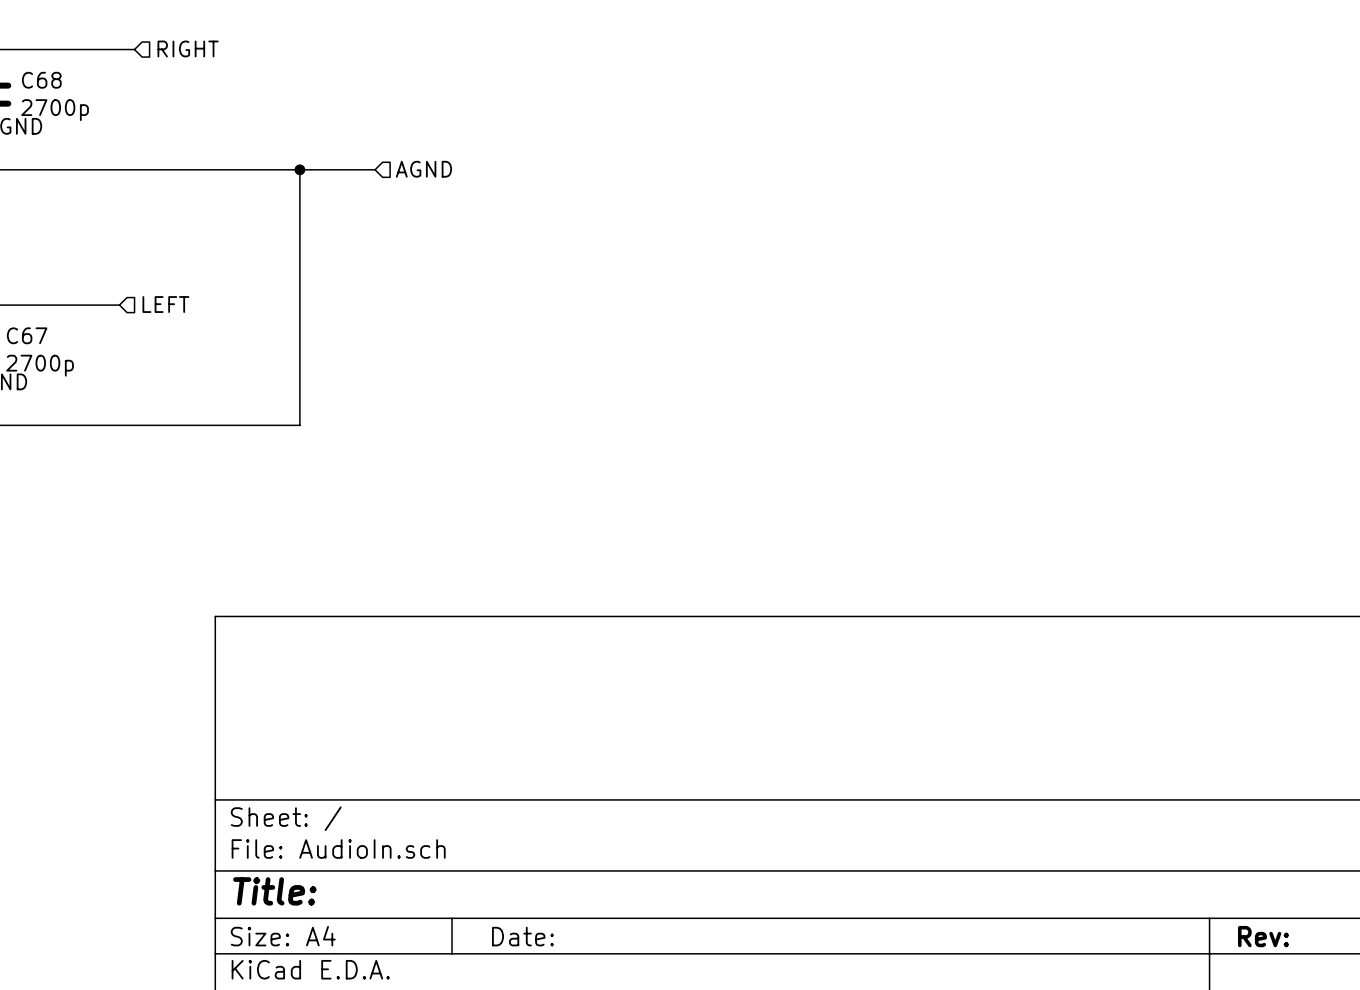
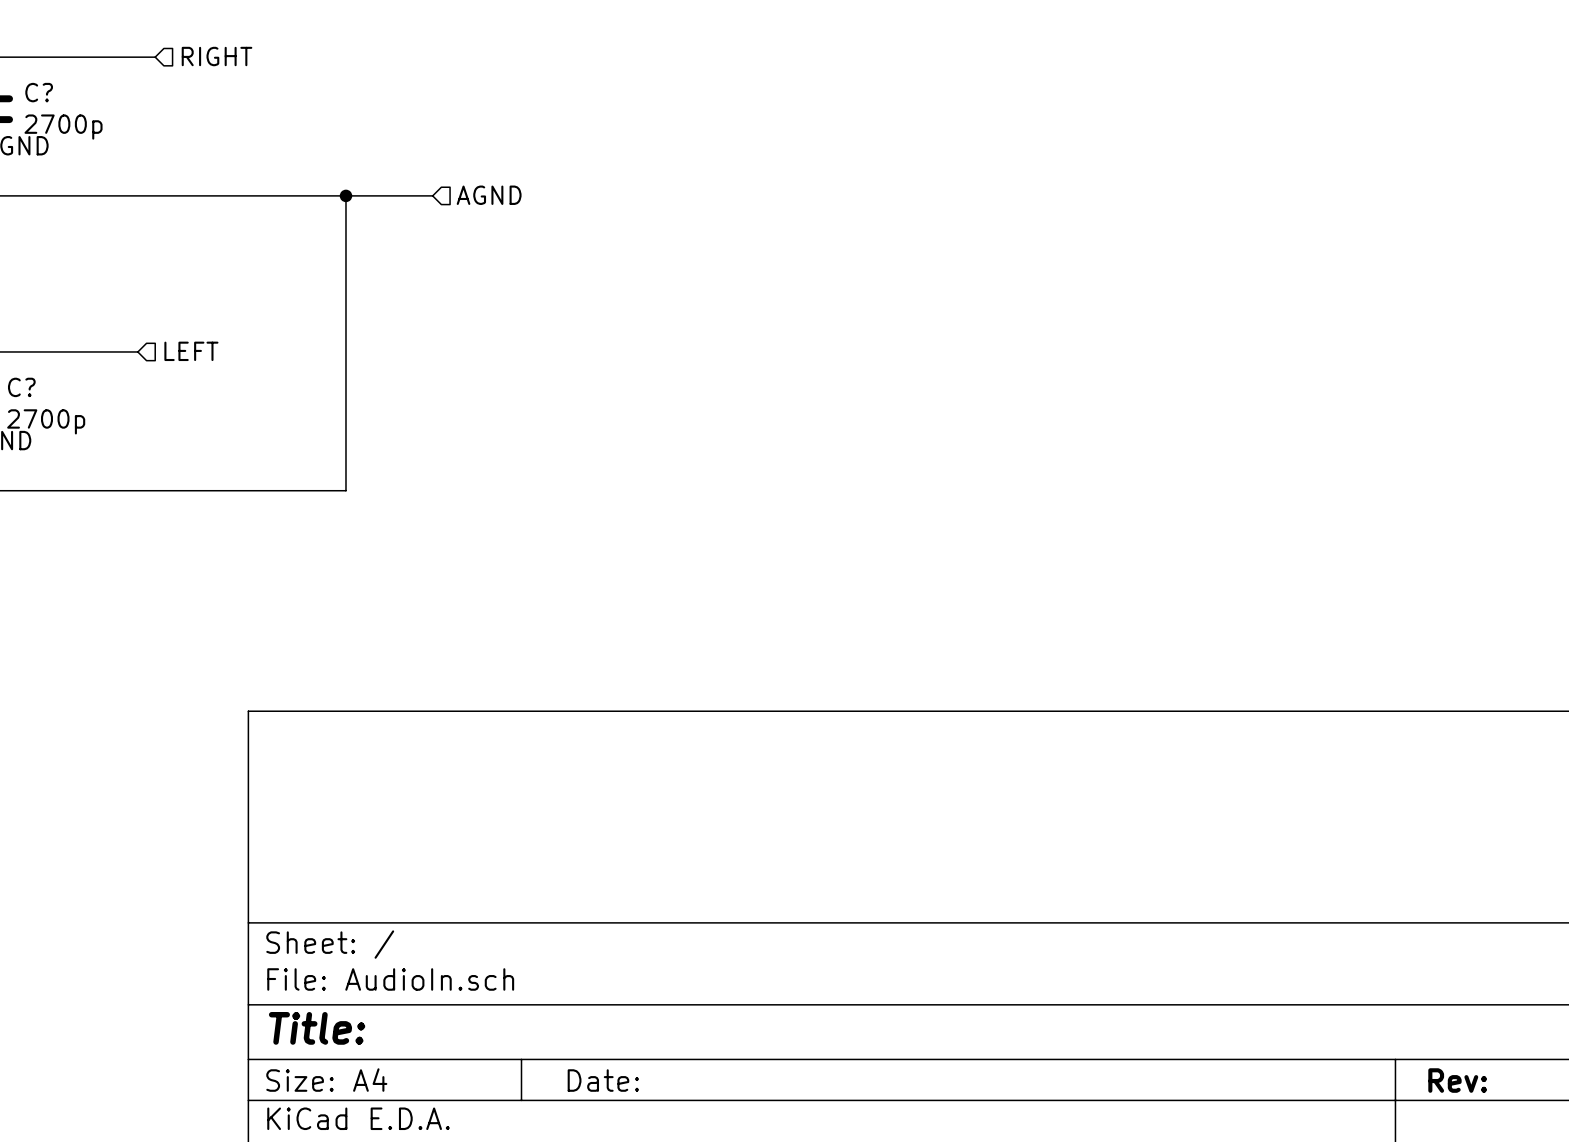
C68 name: C68 (41, 80) -> C? (39, 92)
C67 name: C67 (27, 335) -> C? (21, 387)

